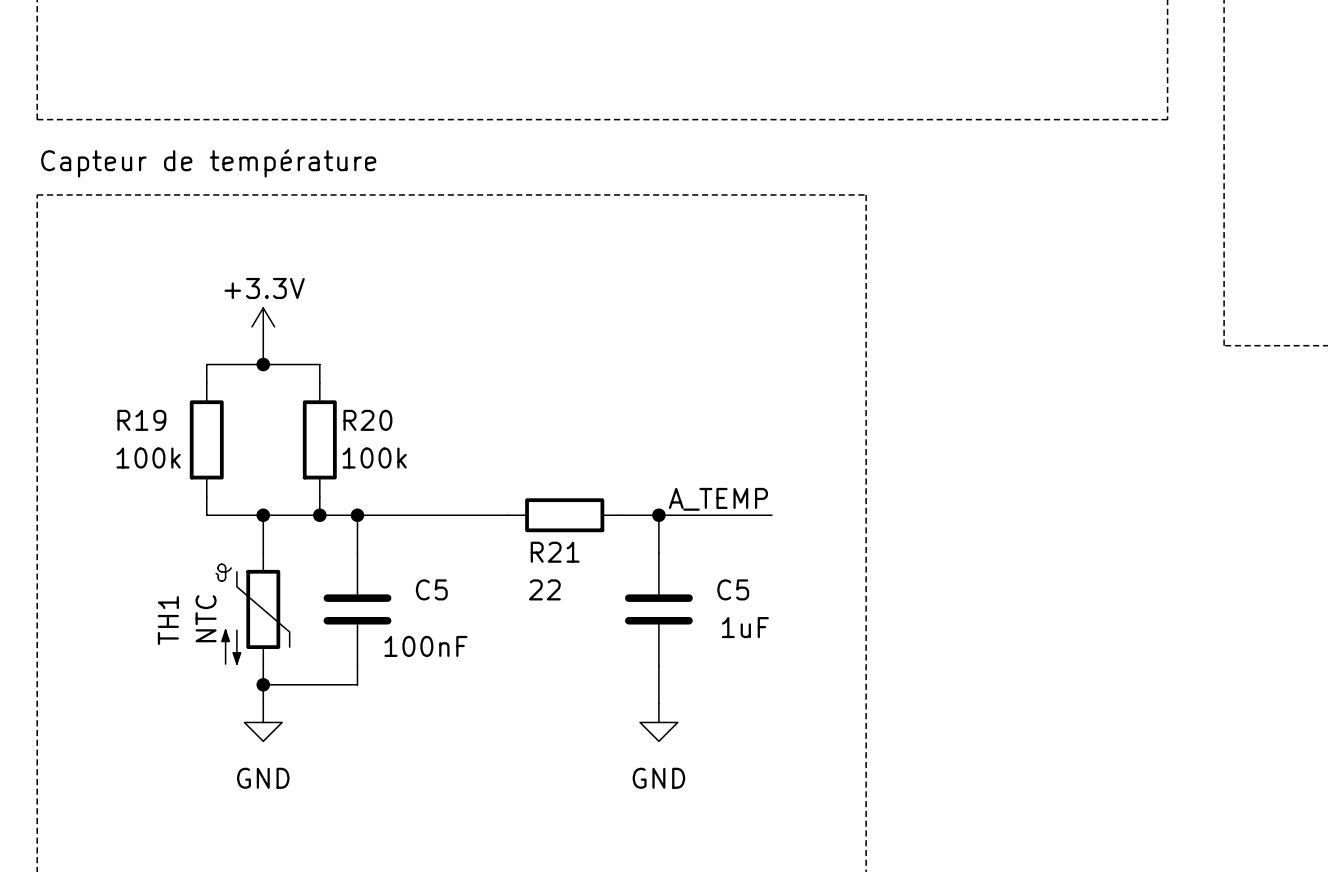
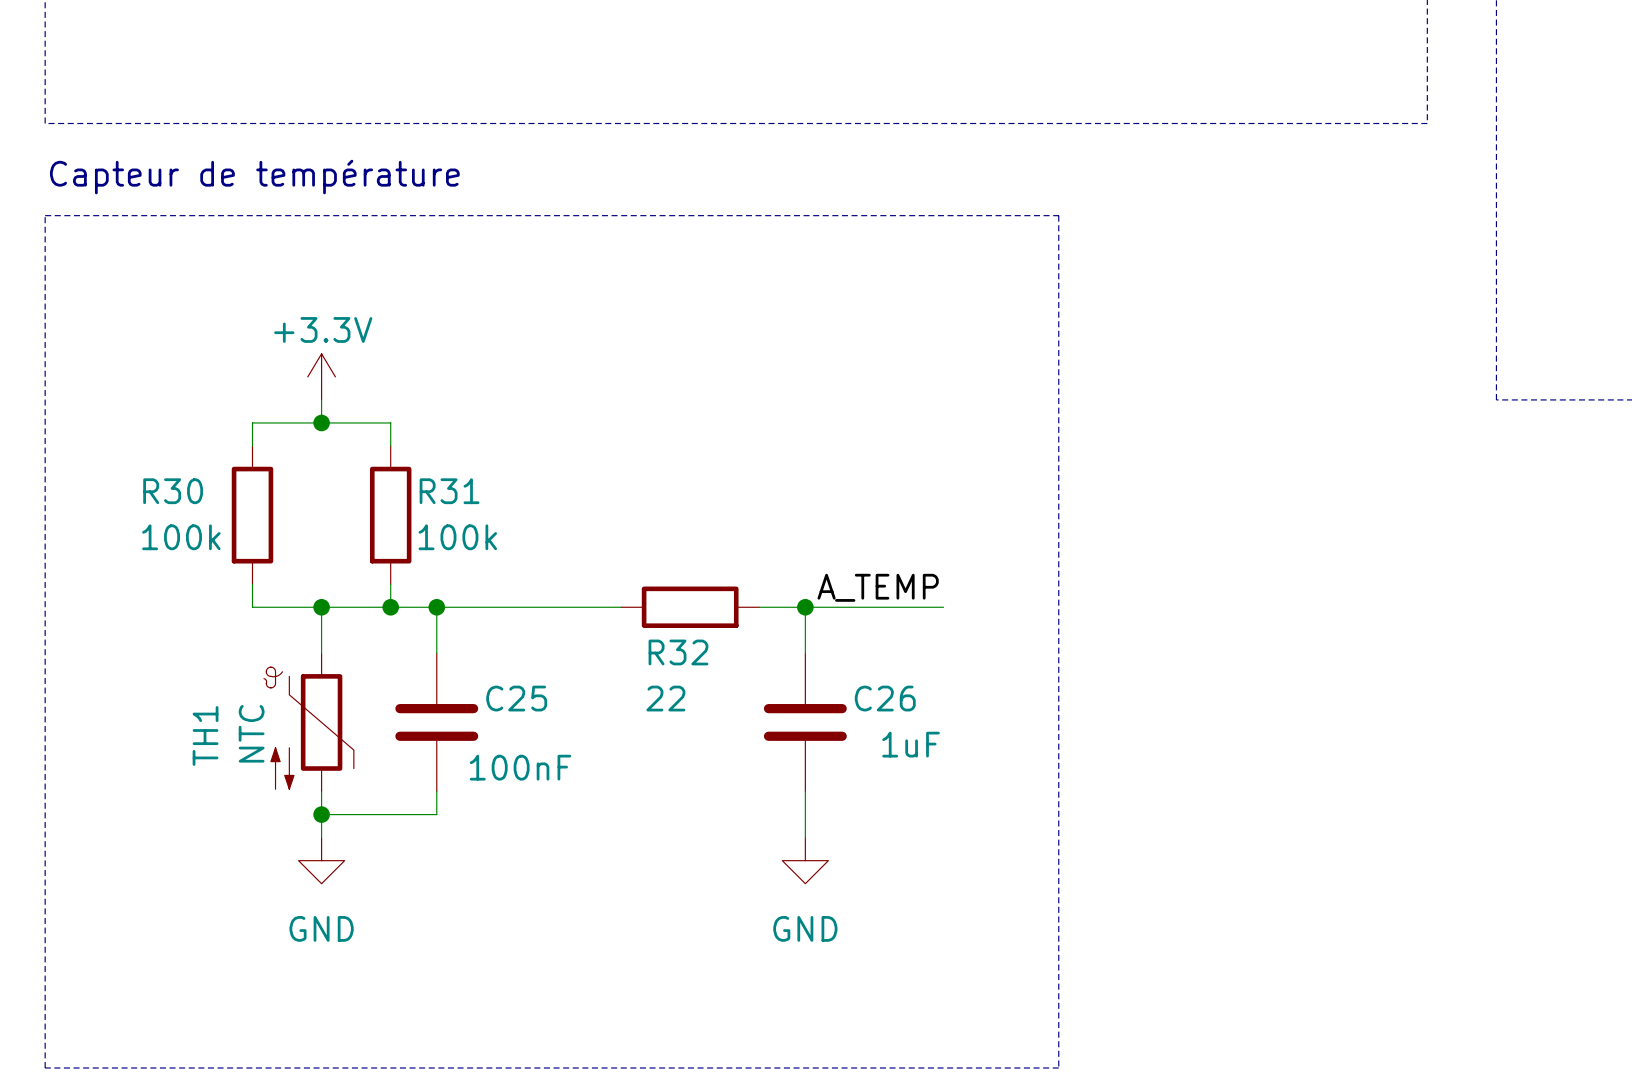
R19 name: R19 (141, 420) -> R30 (173, 491)
R20 name: R20 (367, 420) -> R31 (449, 491)
R21 name: R21 (555, 552) -> R32 (678, 652)
C5 name: C5 (431, 589) -> C25 (516, 698)
C5 name: C5 (733, 589) -> C26 (885, 698)

